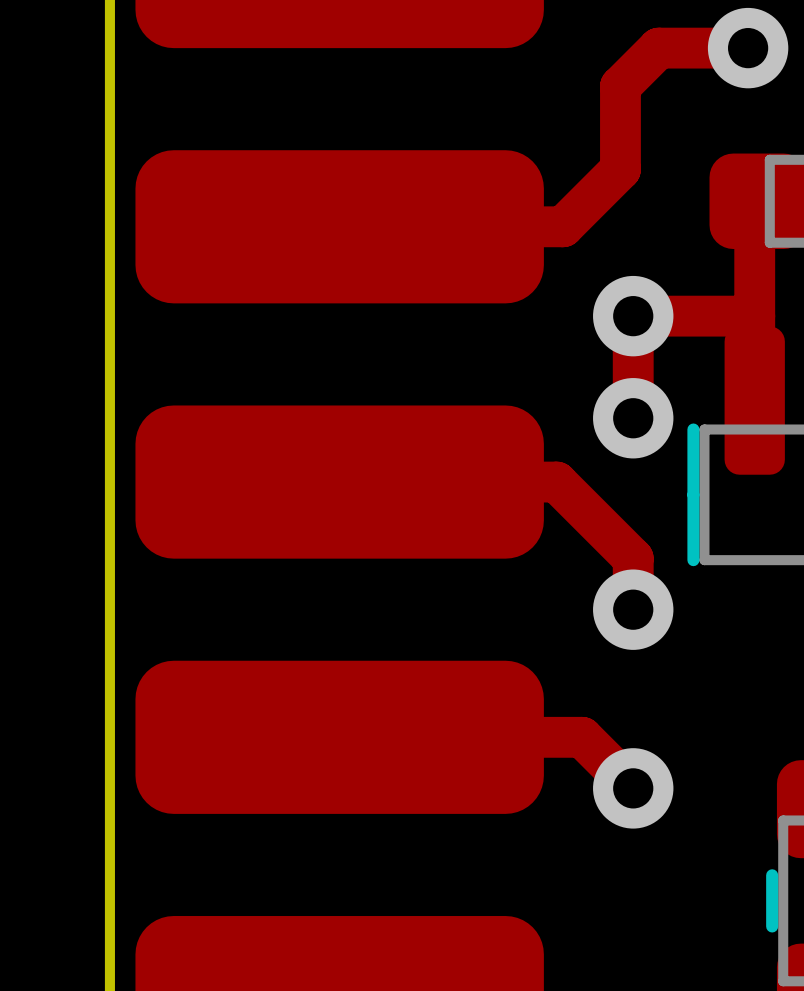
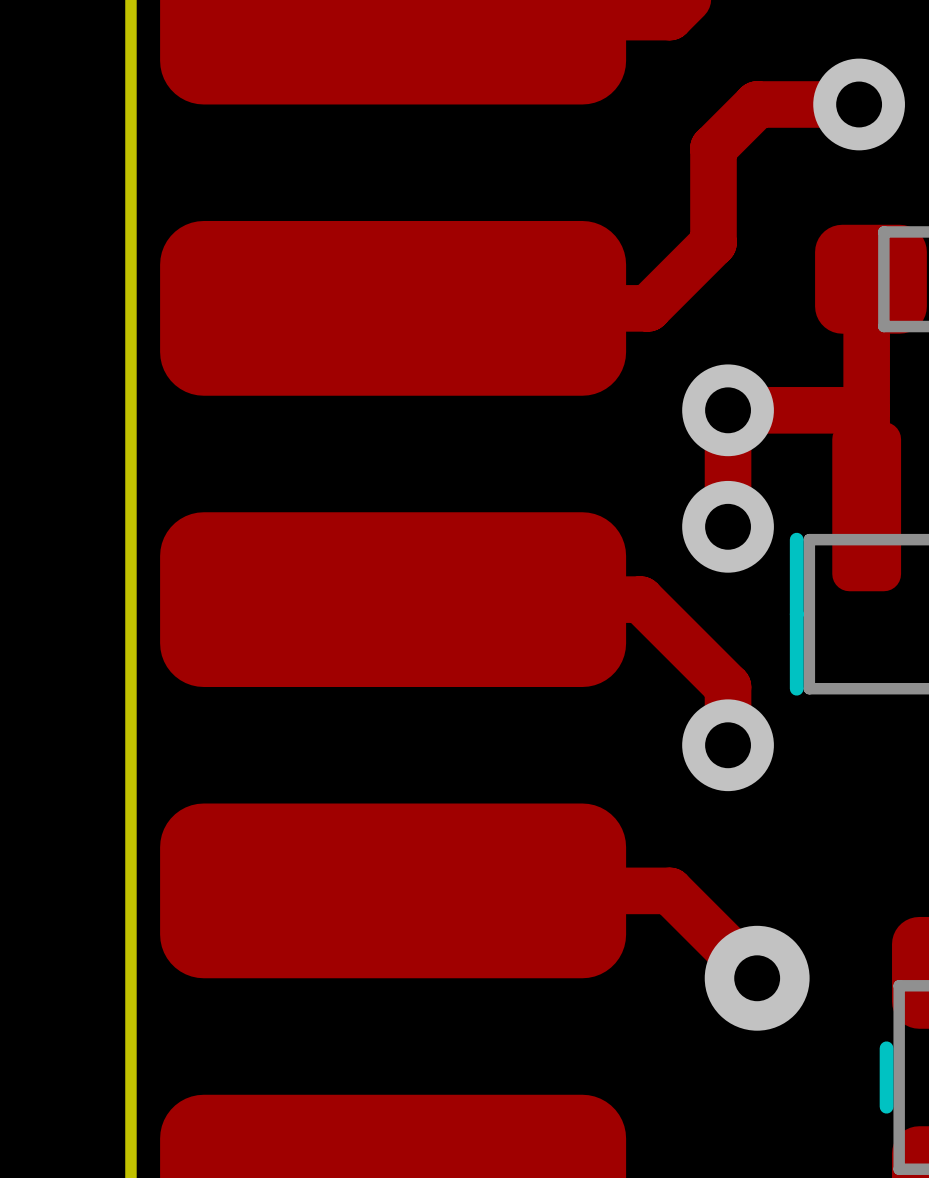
via position: (633, 788) -> (757, 978)

